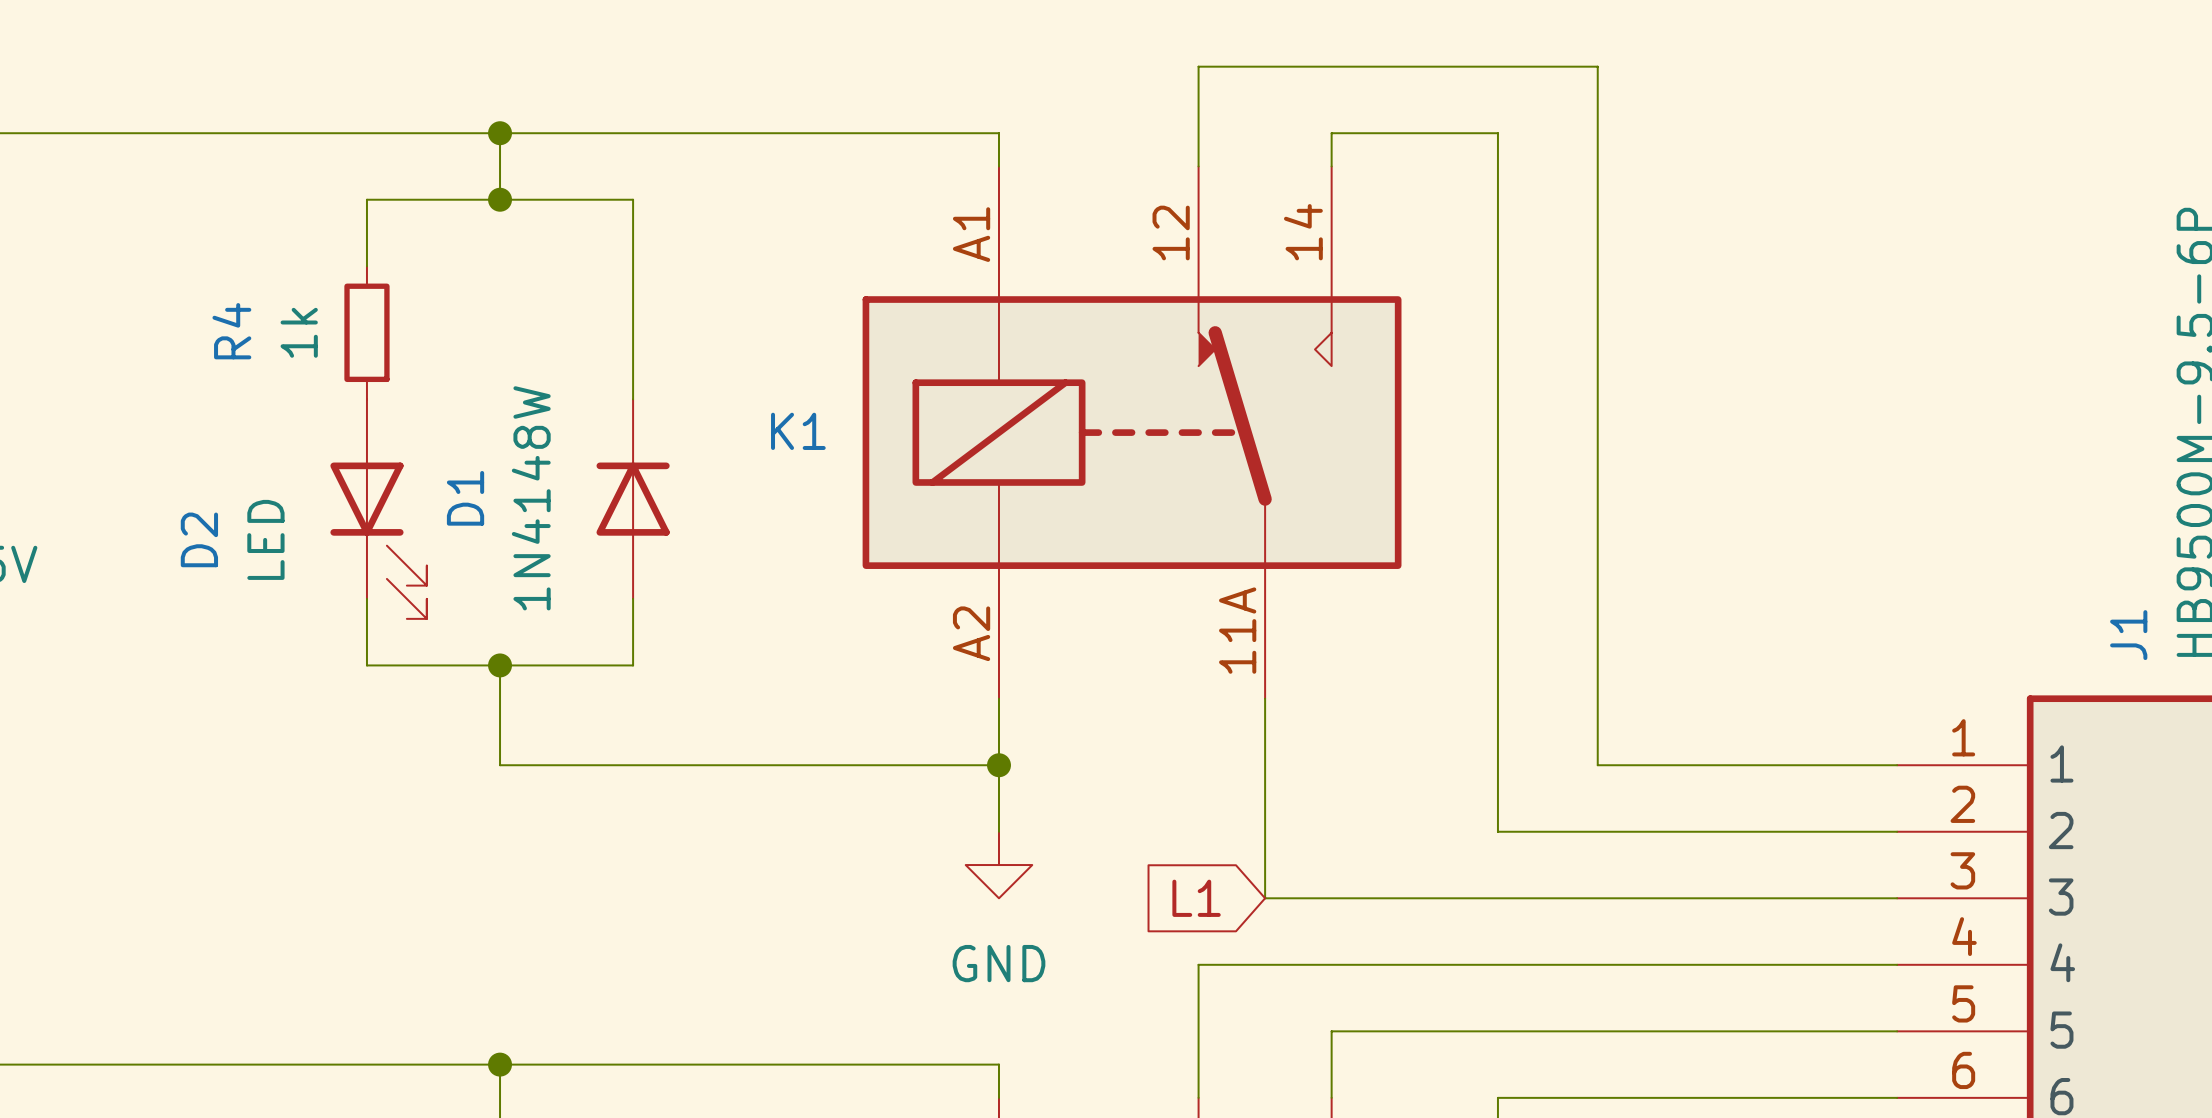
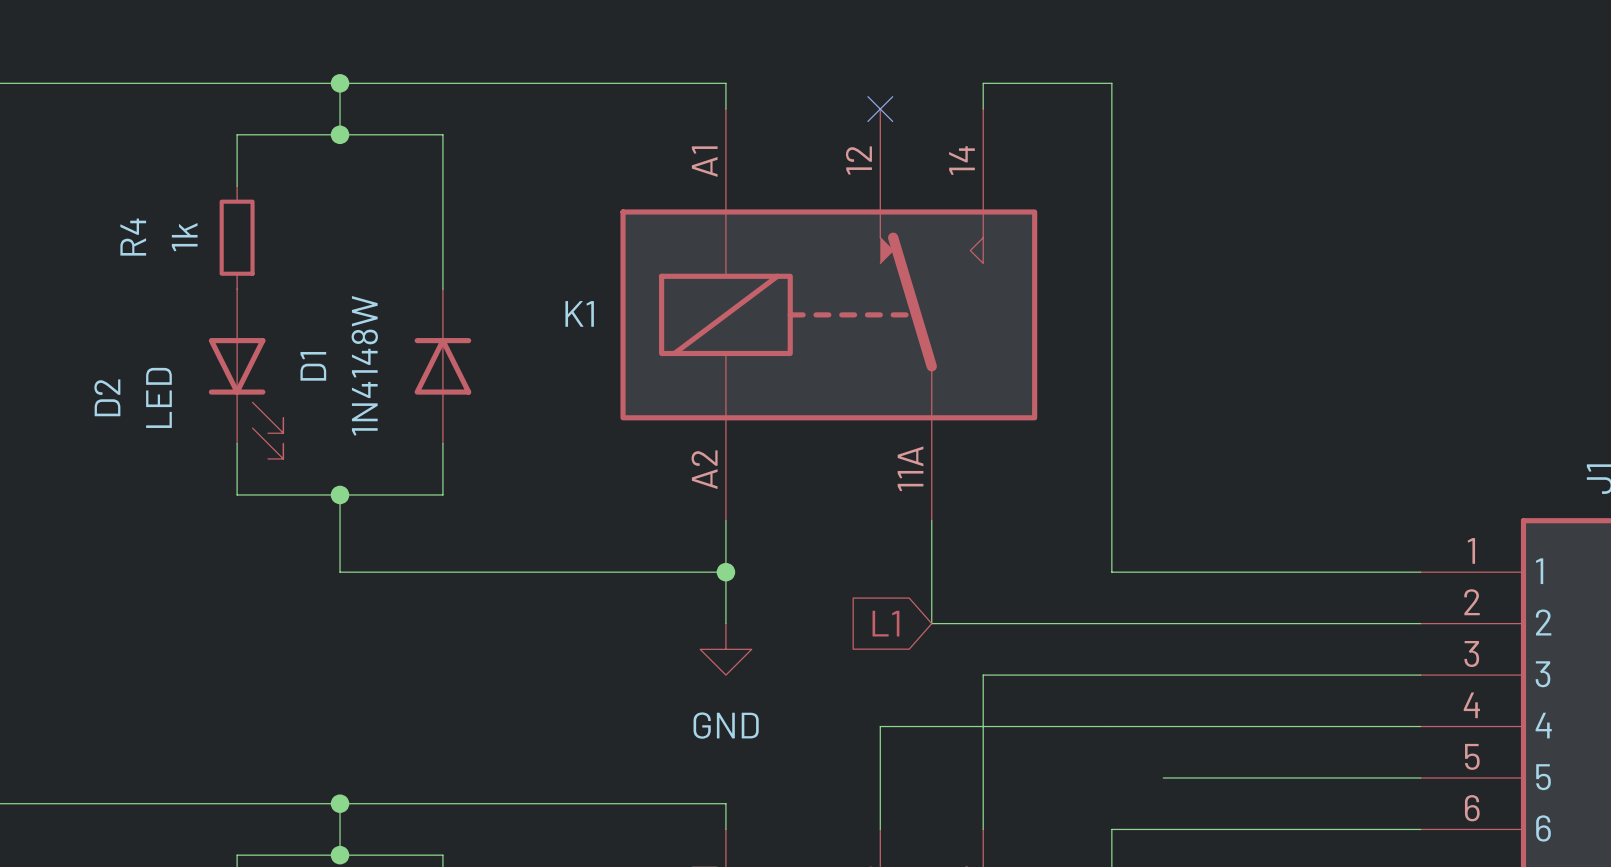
wire: (1198, 166) (1198, 66) (1597, 66) (1597, 765) -> none
no-connect mark: none -> (880, 109)
wire: (1497, 765) (1497, 831) -> (1111, 572) (1189, 572)
wire: (1265, 831) (1265, 898) (1331, 898) -> (931, 623) (1111, 623)
global label position: L1 (1196, 898) -> L1 (885, 623)
wire: (1331, 1031) (1564, 1031) -> (983, 777) (983, 675)

